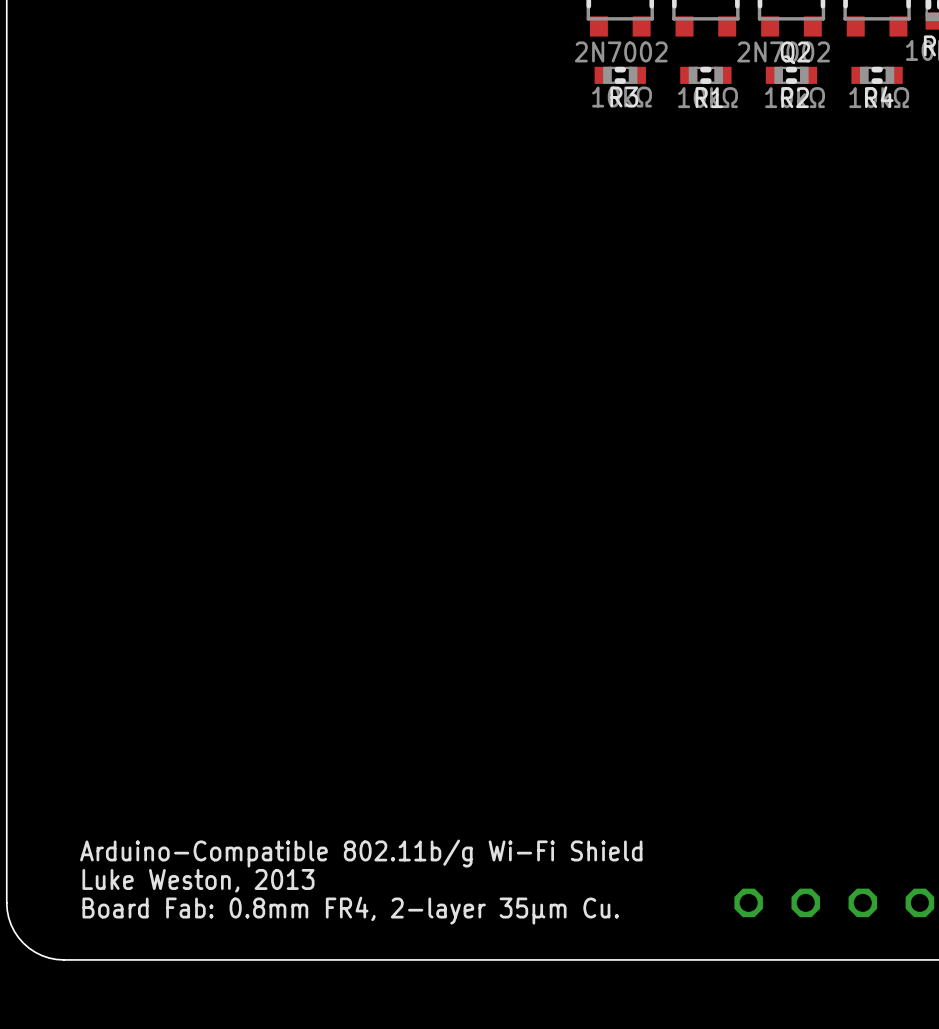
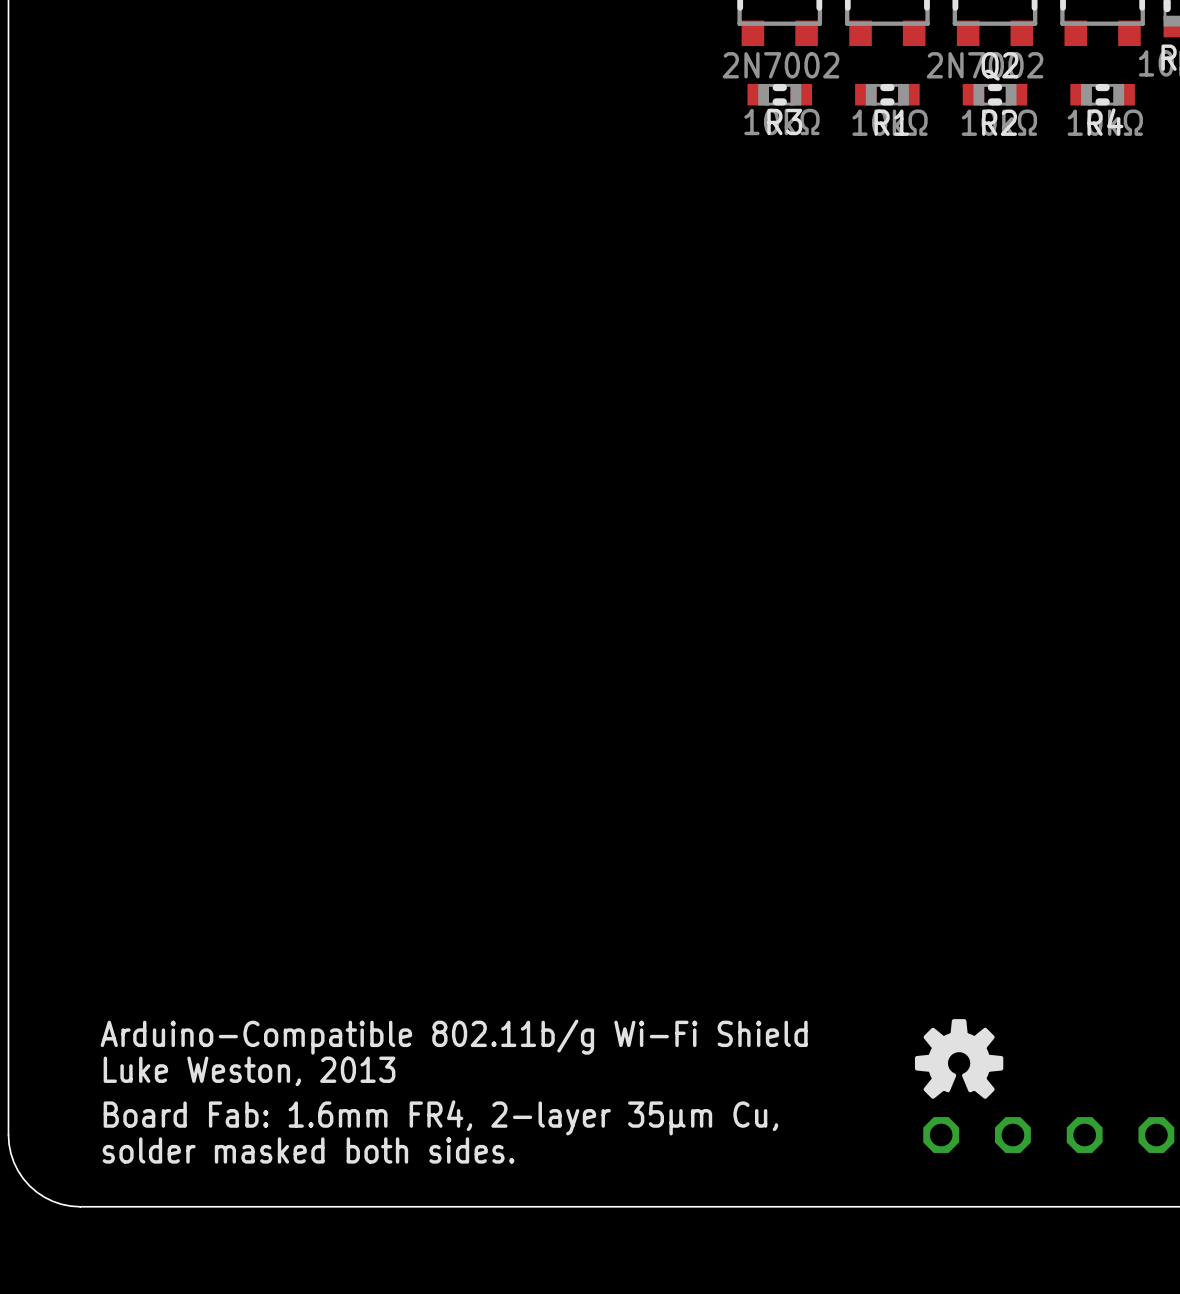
drawing: none -> [914, 1019, 1004, 1099]
text: none -> Arduino-Compatible 802.11b/g Wi-Fi Shield (454, 1037)
text: Arduino-Compatible 802.11b/g Wi-Fi Shield (361, 853) -> Luke Weston, 2013 (249, 1071)
text: Luke Weston, 2013 (198, 880) -> Board Fab: 1.6mm FR4, 2-layer 35µm Cu, (440, 1117)
text: Board Fab: 0.8mm FR4, 2-layer 35µm Cu. (350, 910) -> solder masked both sides. (308, 1150)

